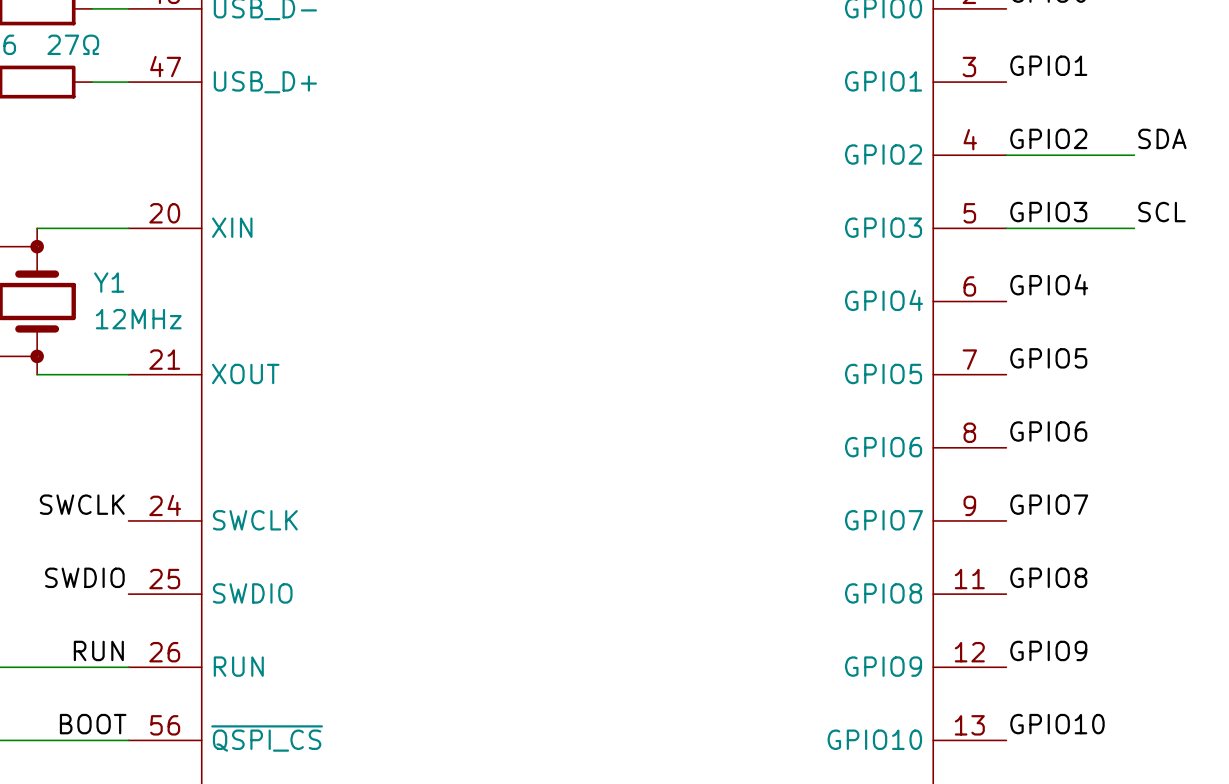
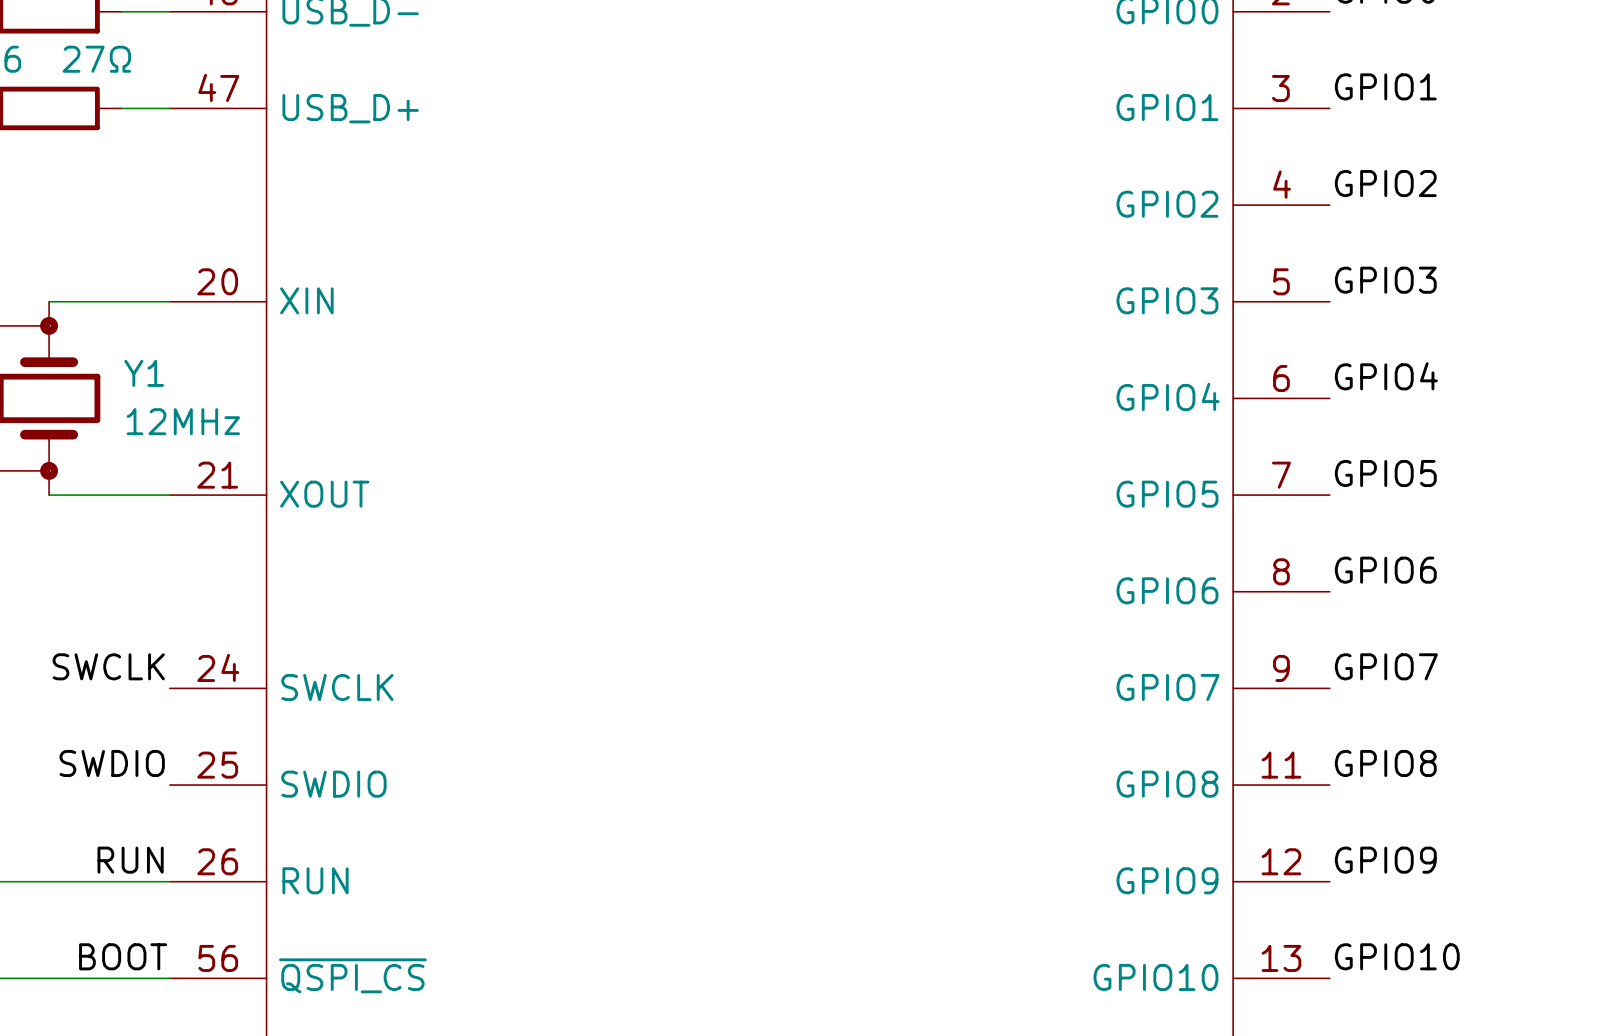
label: SDA (1162, 138) -> none
wire: (1006, 155) (1134, 155) -> none
label: SCL (1161, 212) -> none
wire: (1006, 228) (1134, 228) -> none

